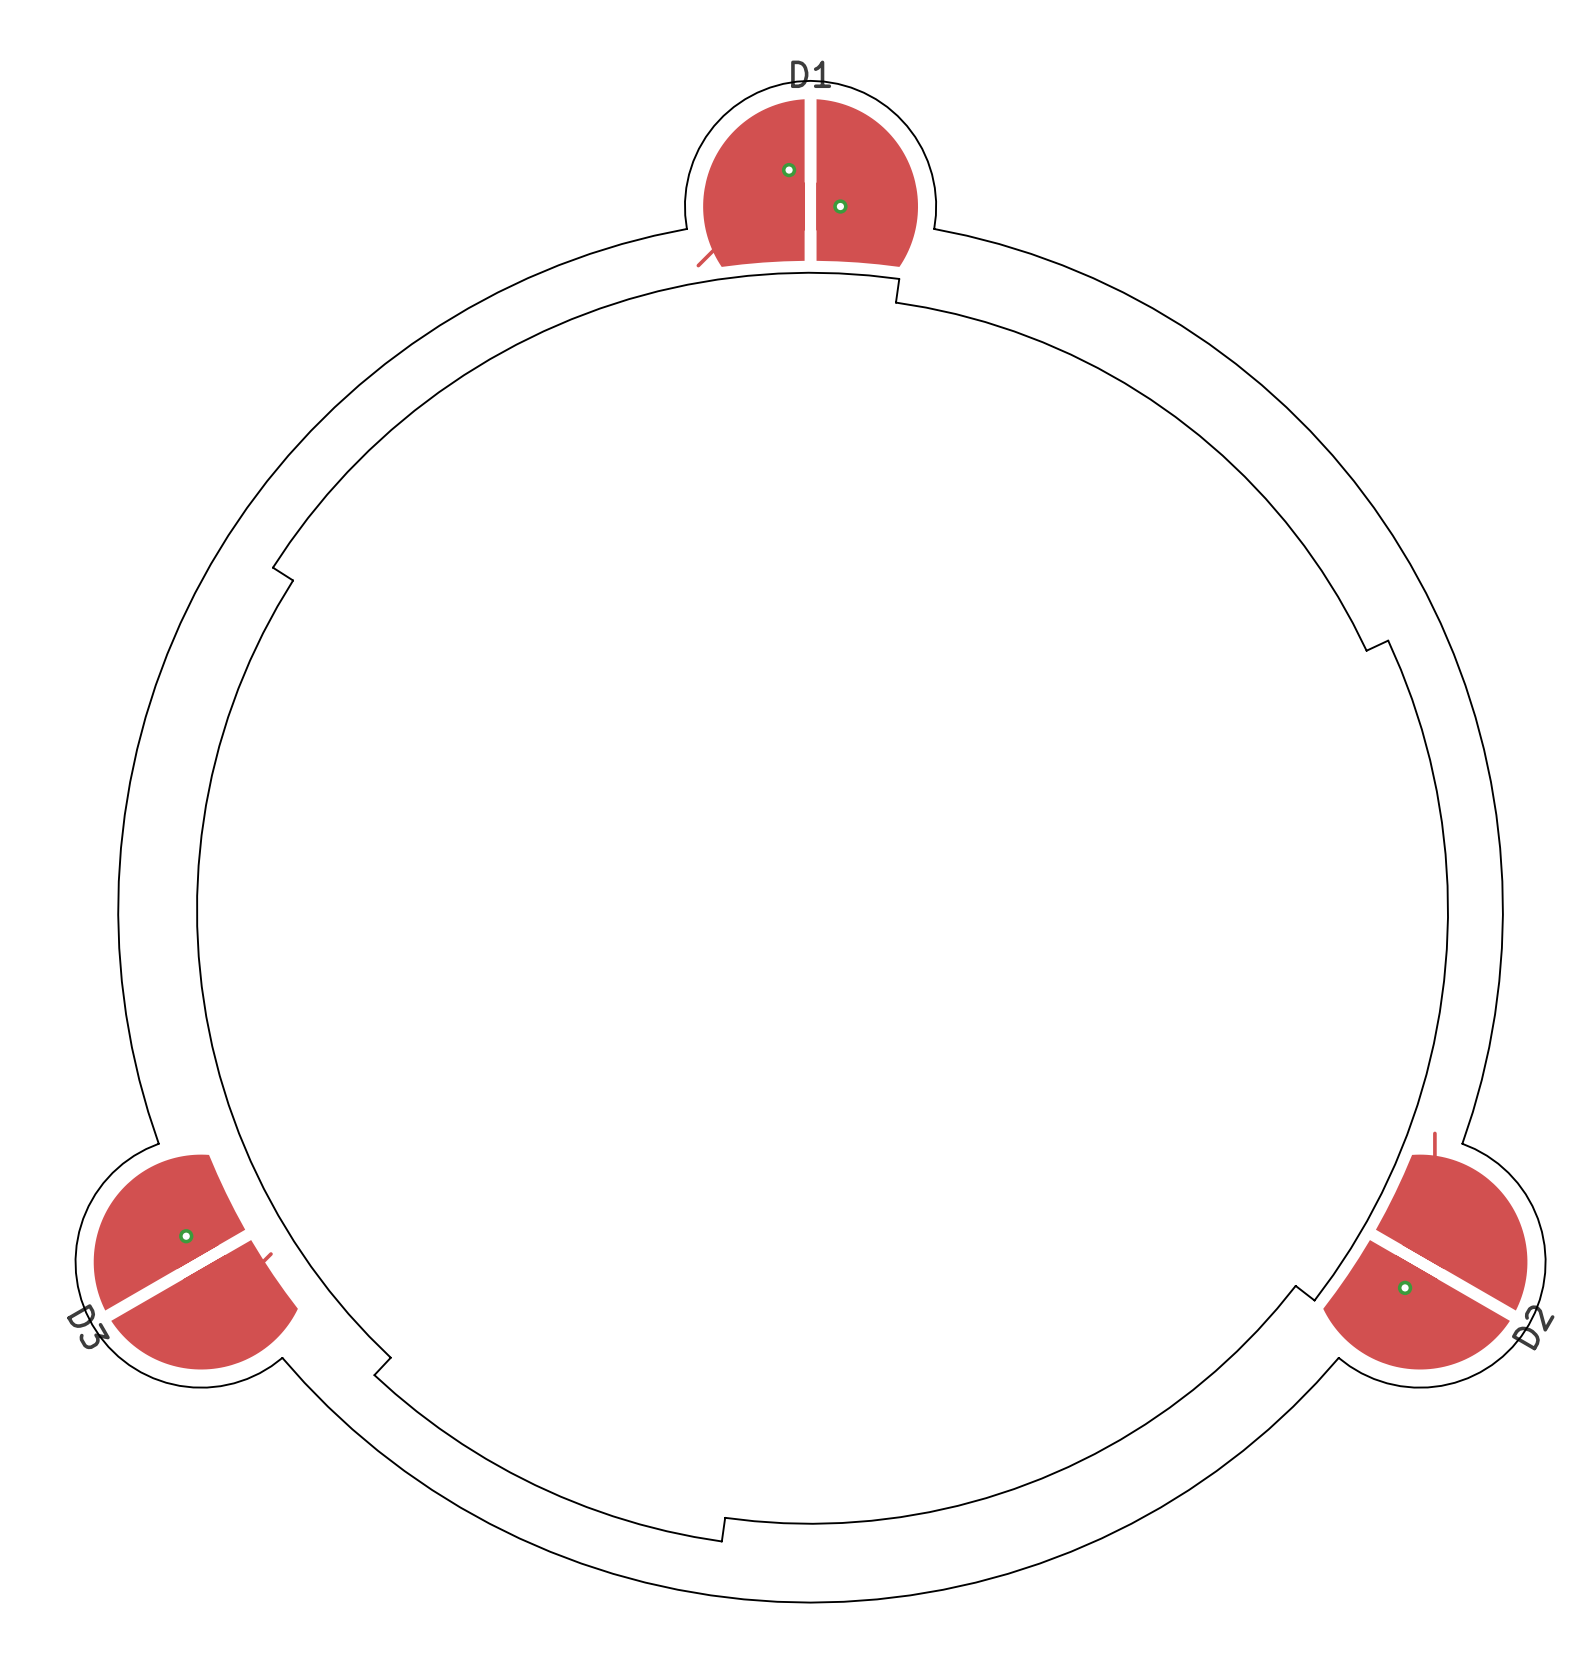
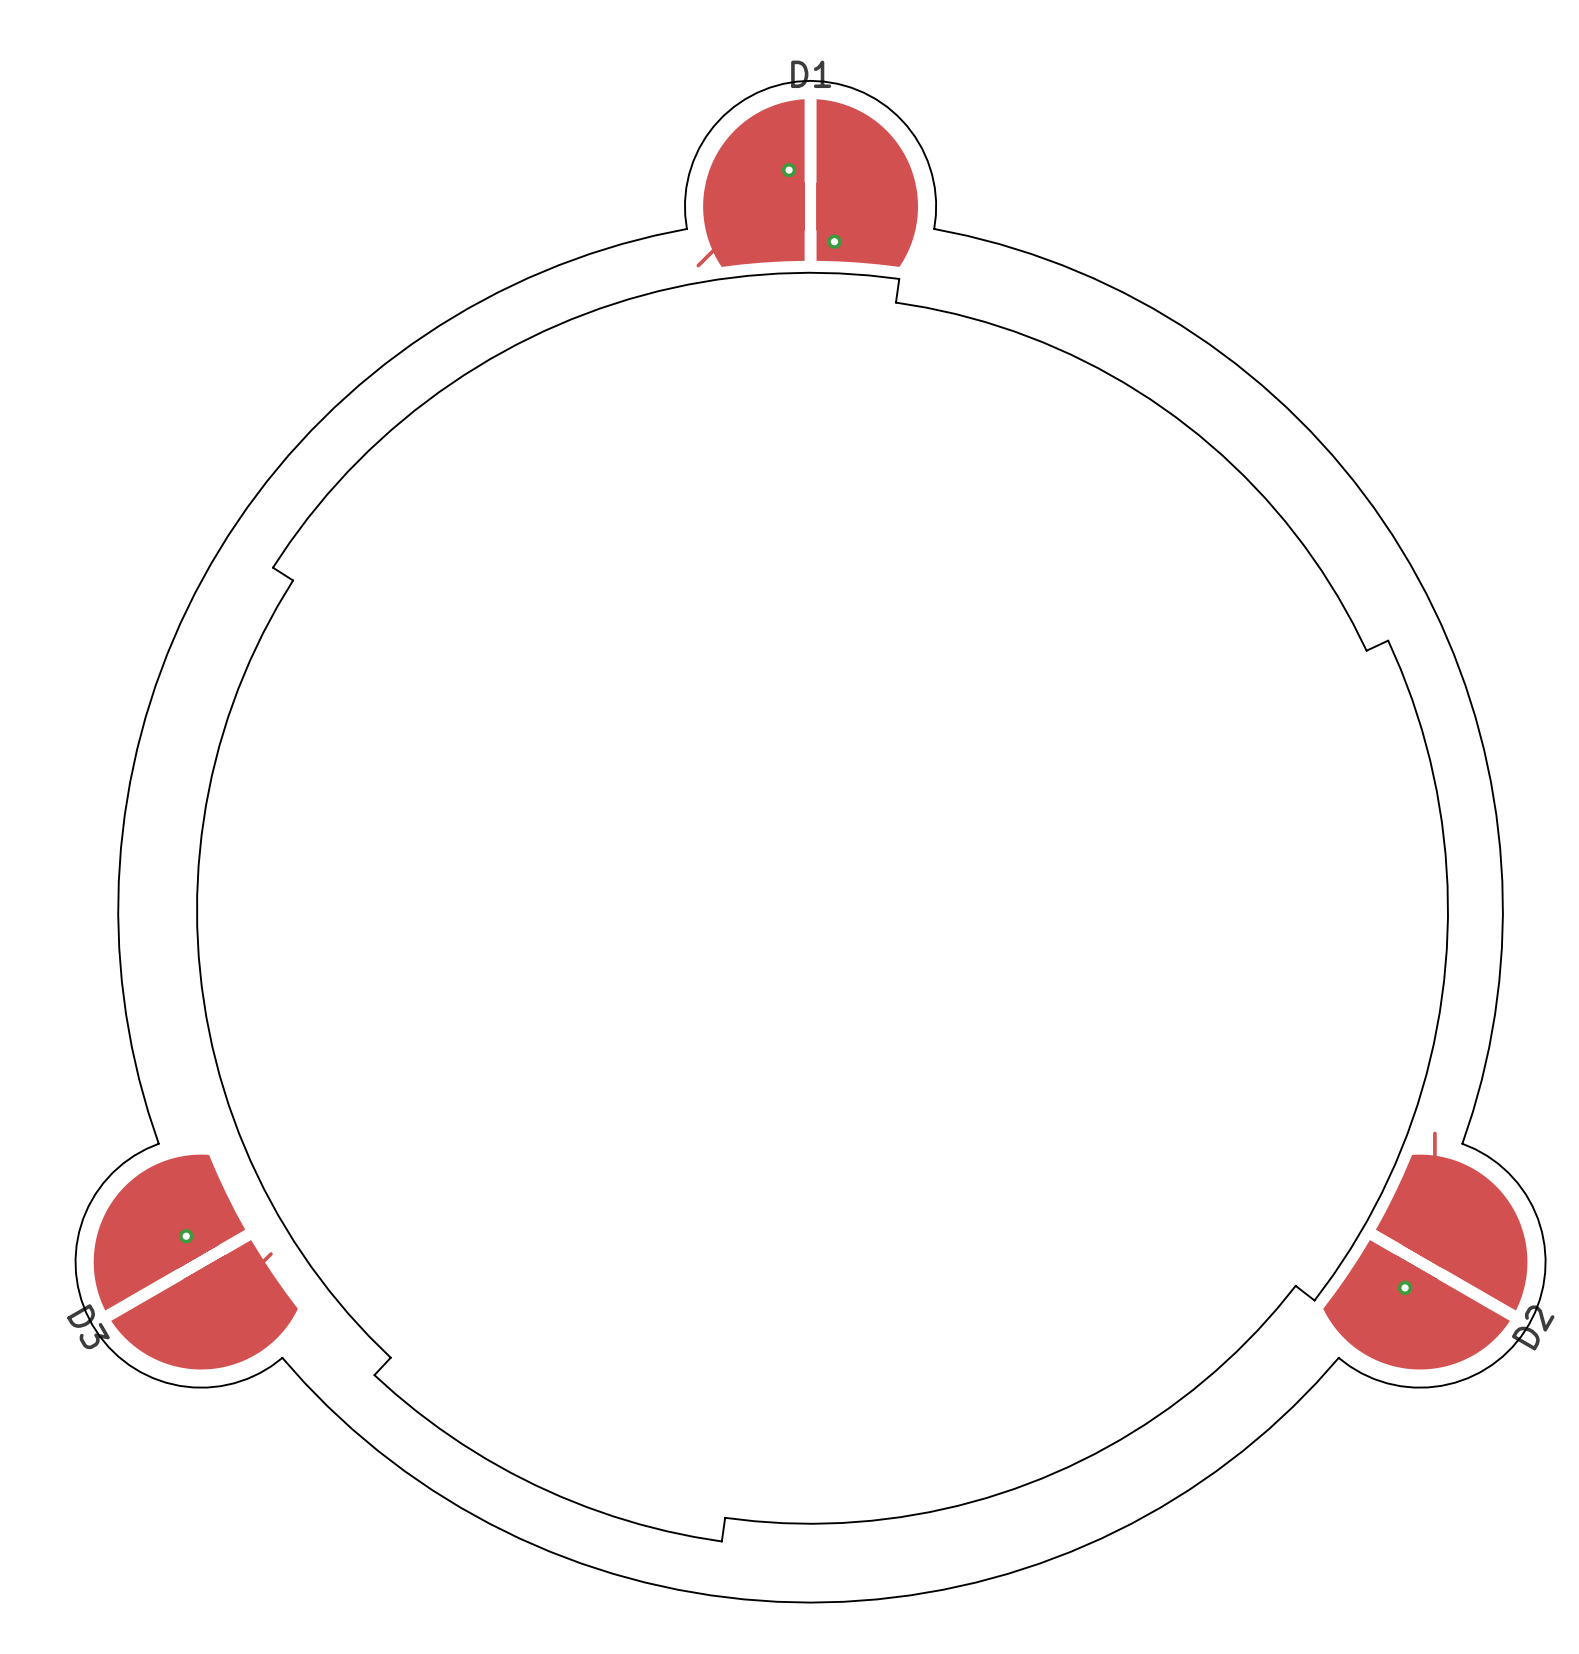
via position: (840, 206) -> (834, 241)

